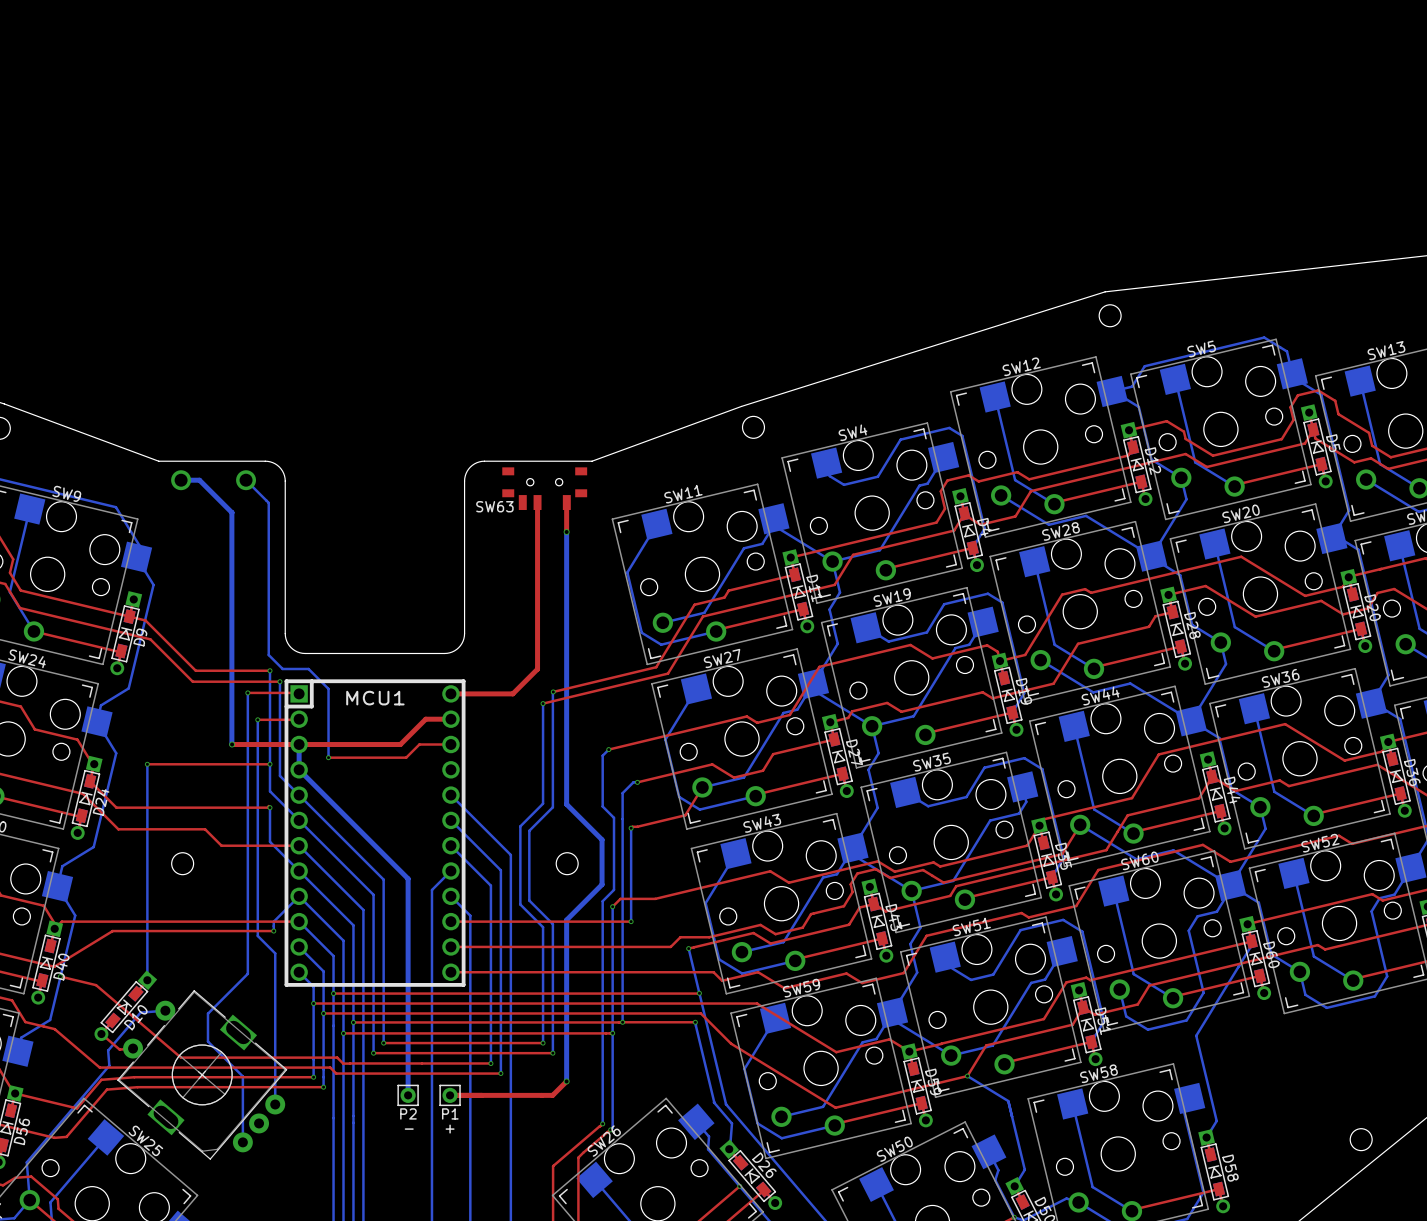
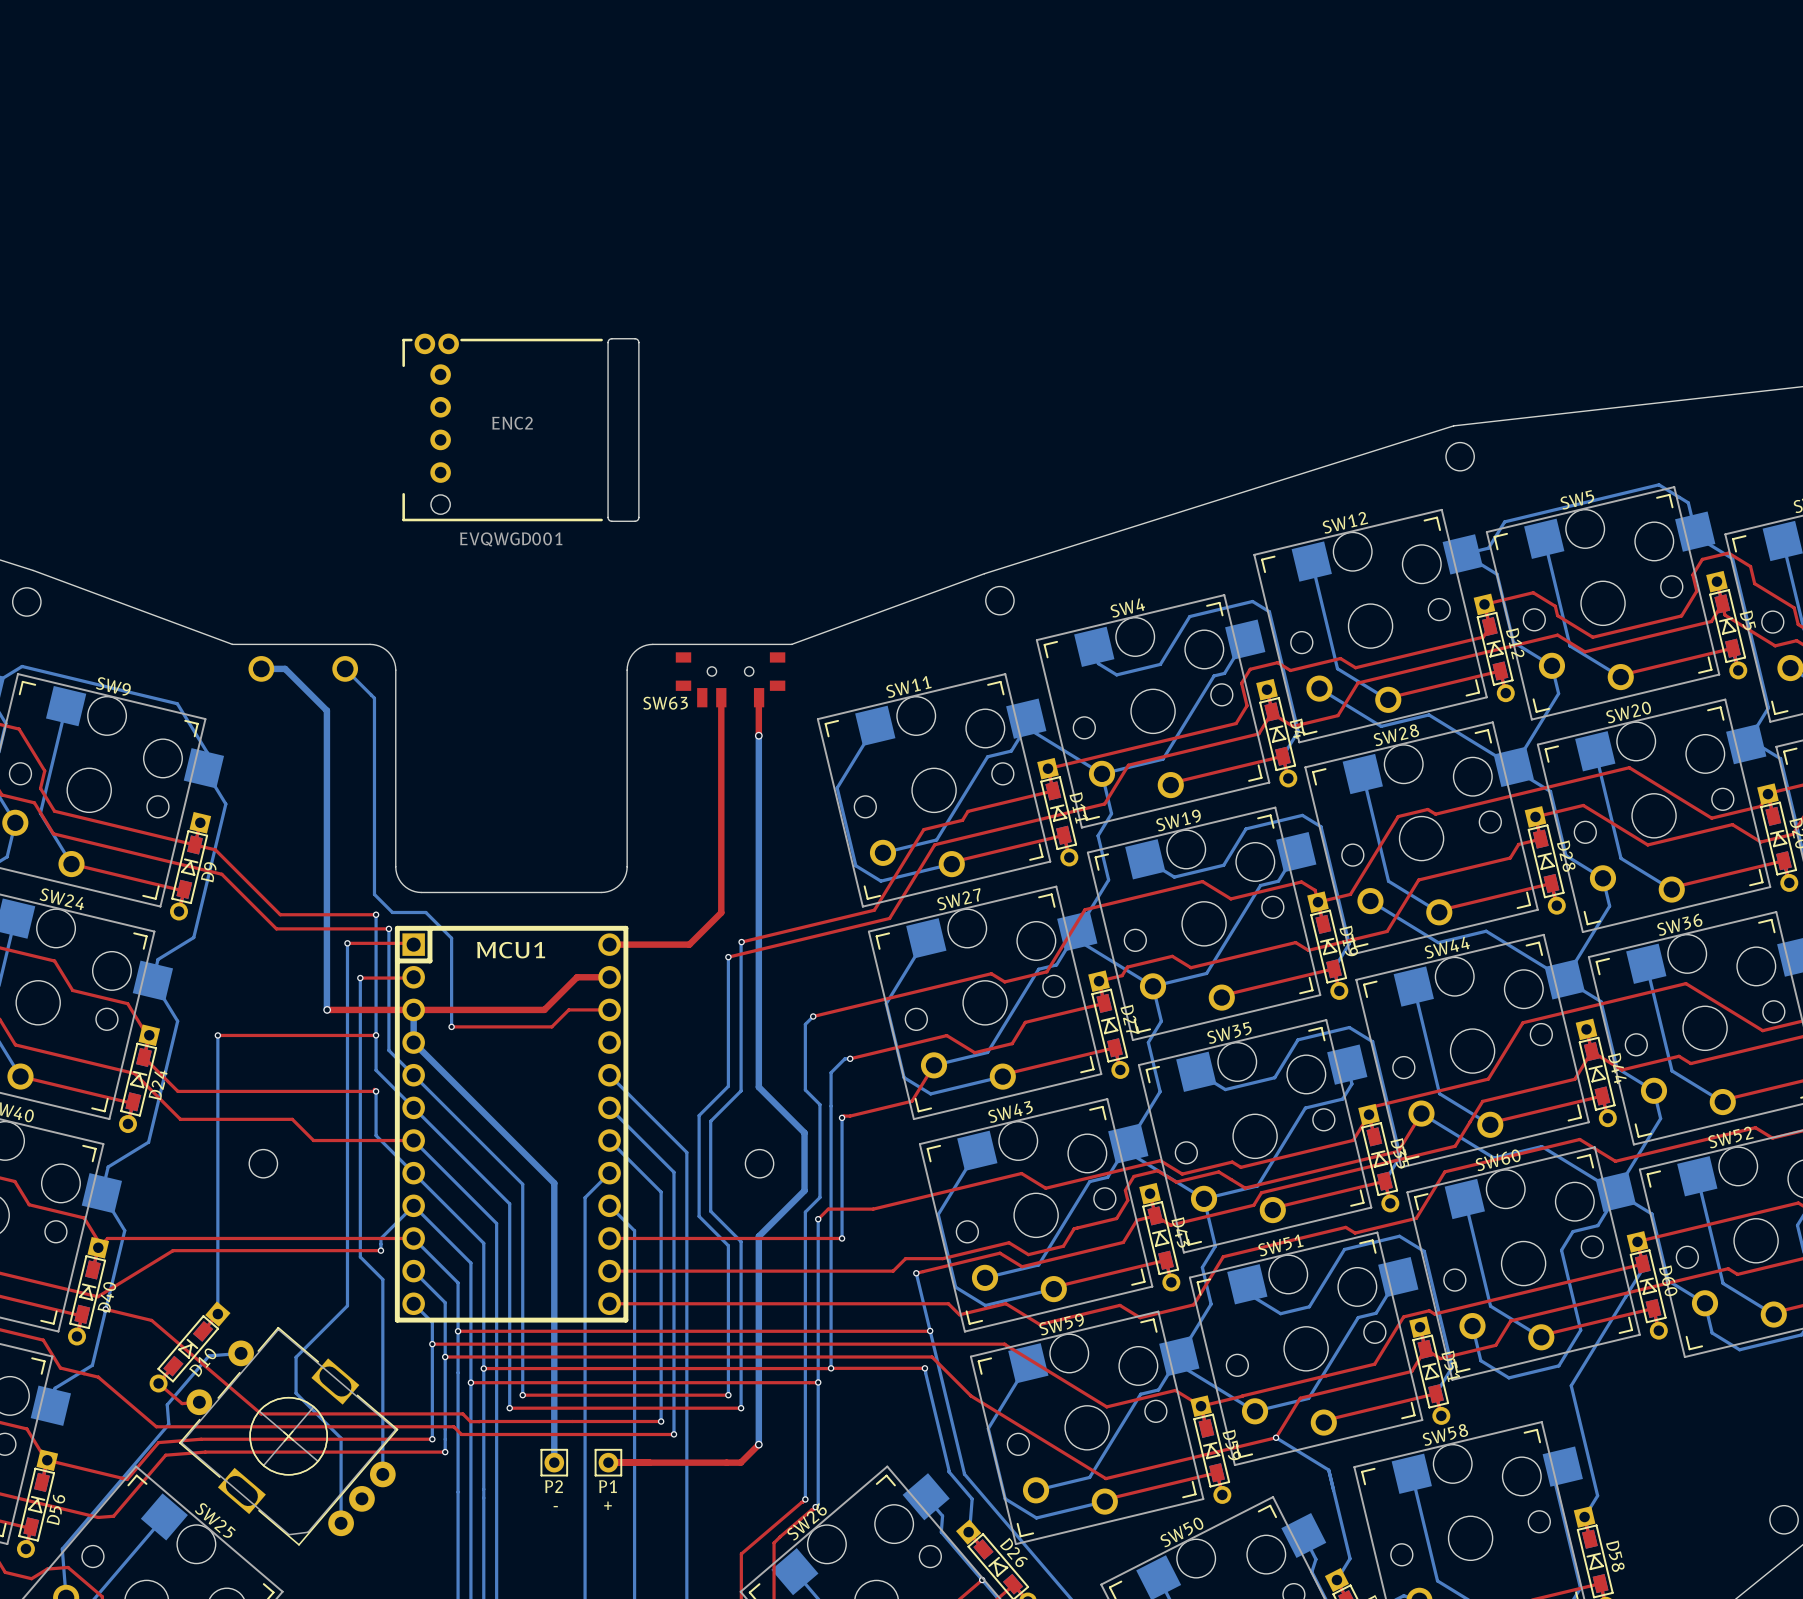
ENC2: none -> EVQWGD001 (520, 427)

